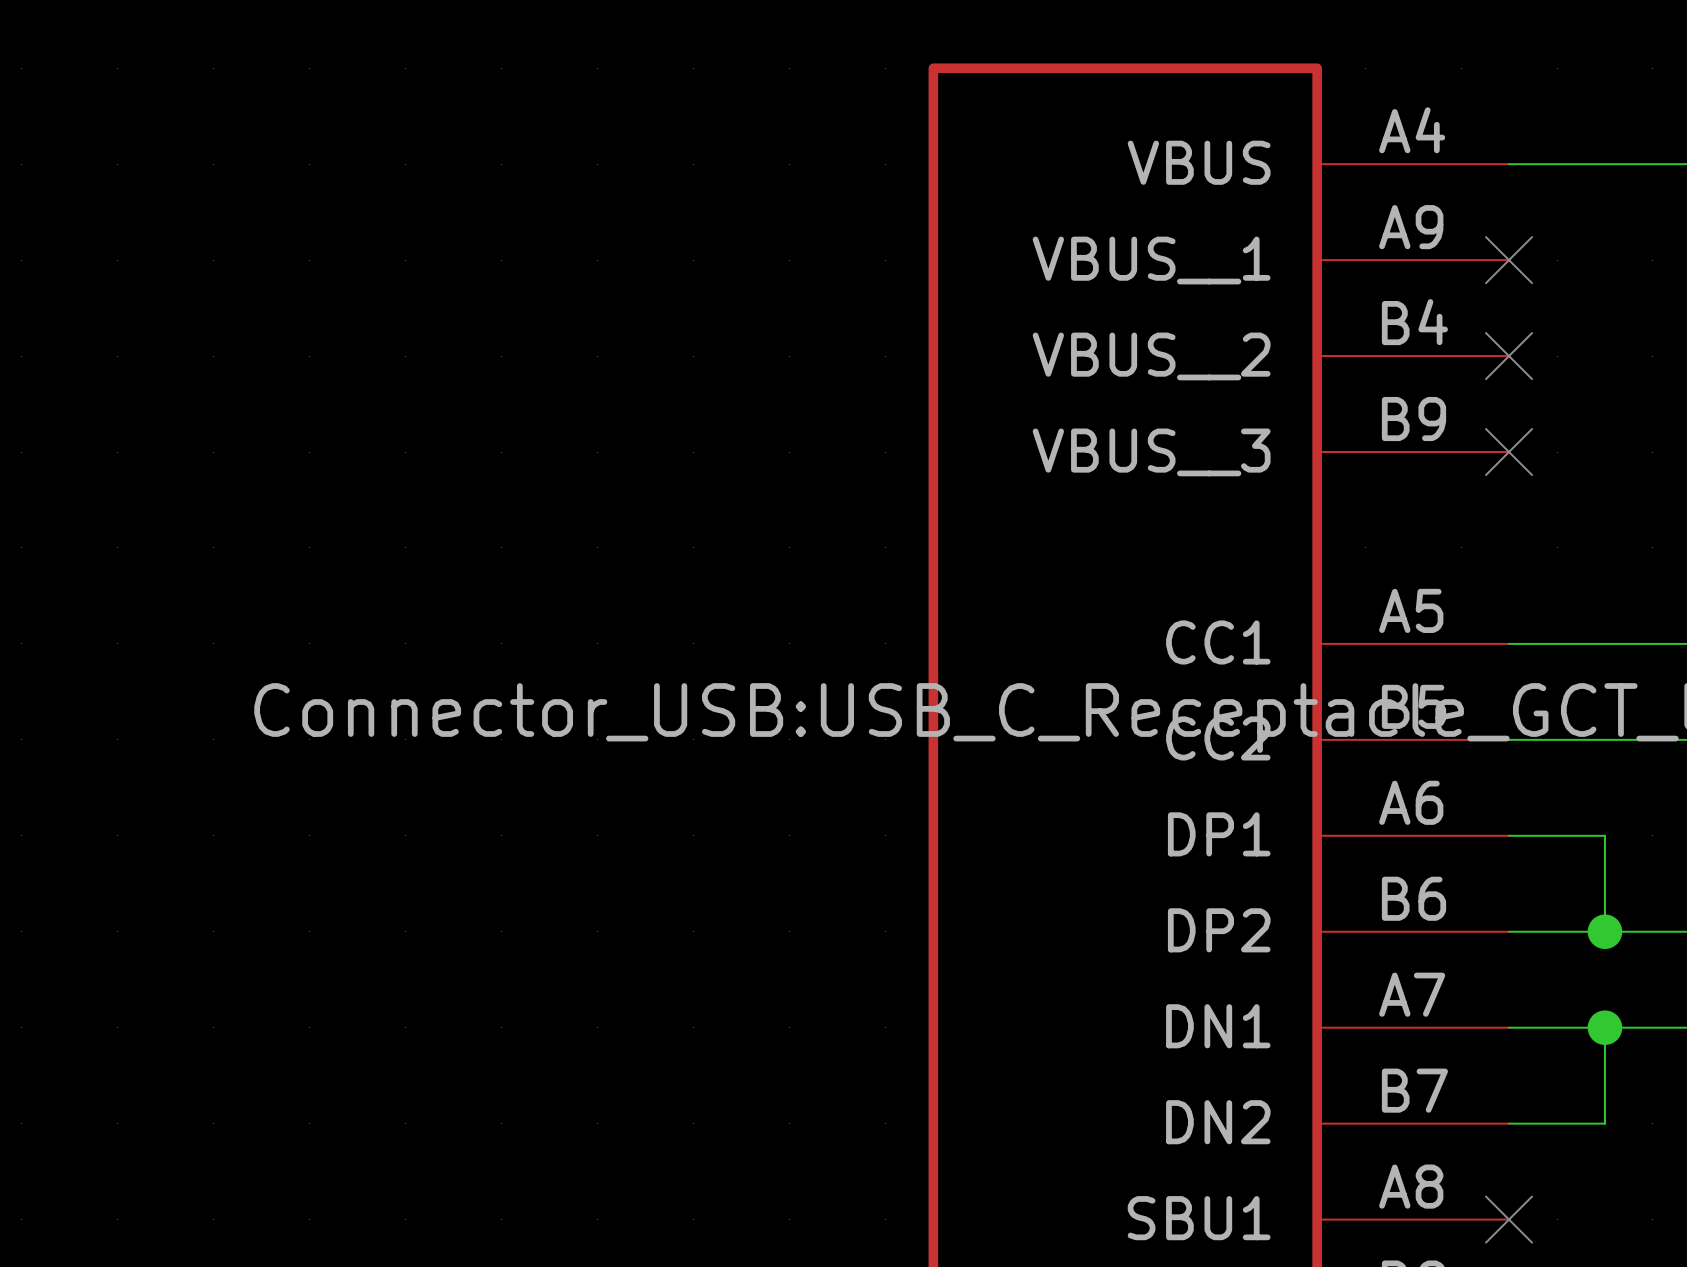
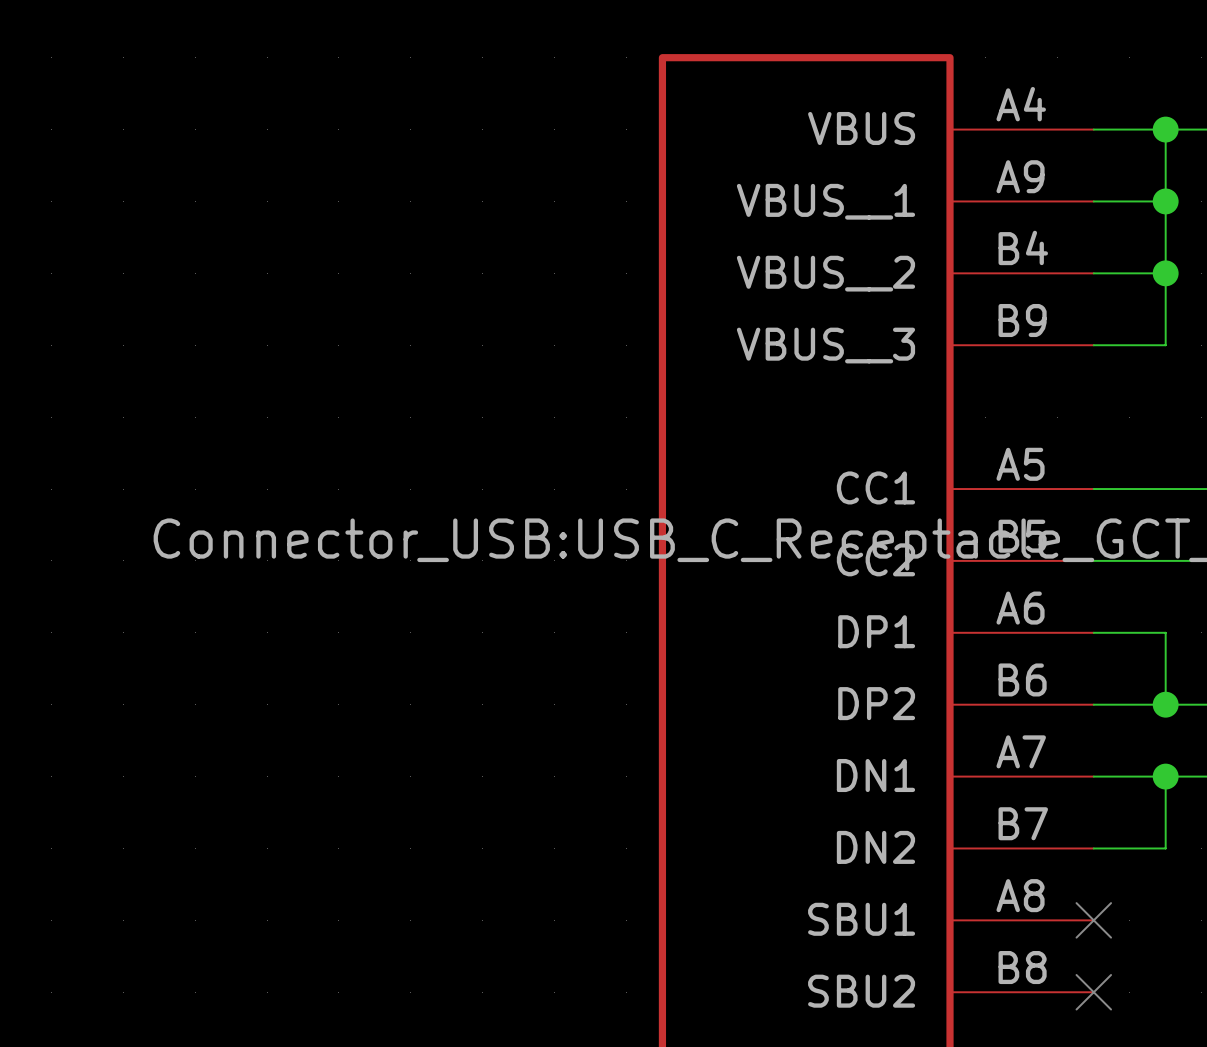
wire: none -> (1165, 129) (1165, 345) (1093, 345)
junction: none -> (1165, 129)
wire: none -> (1093, 201) (1165, 201)
no-connect mark: (1509, 260) -> none
junction: none -> (1165, 201)
wire: none -> (1093, 273) (1165, 273)
no-connect mark: (1509, 356) -> none
junction: none -> (1165, 273)
no-connect mark: (1509, 452) -> none

